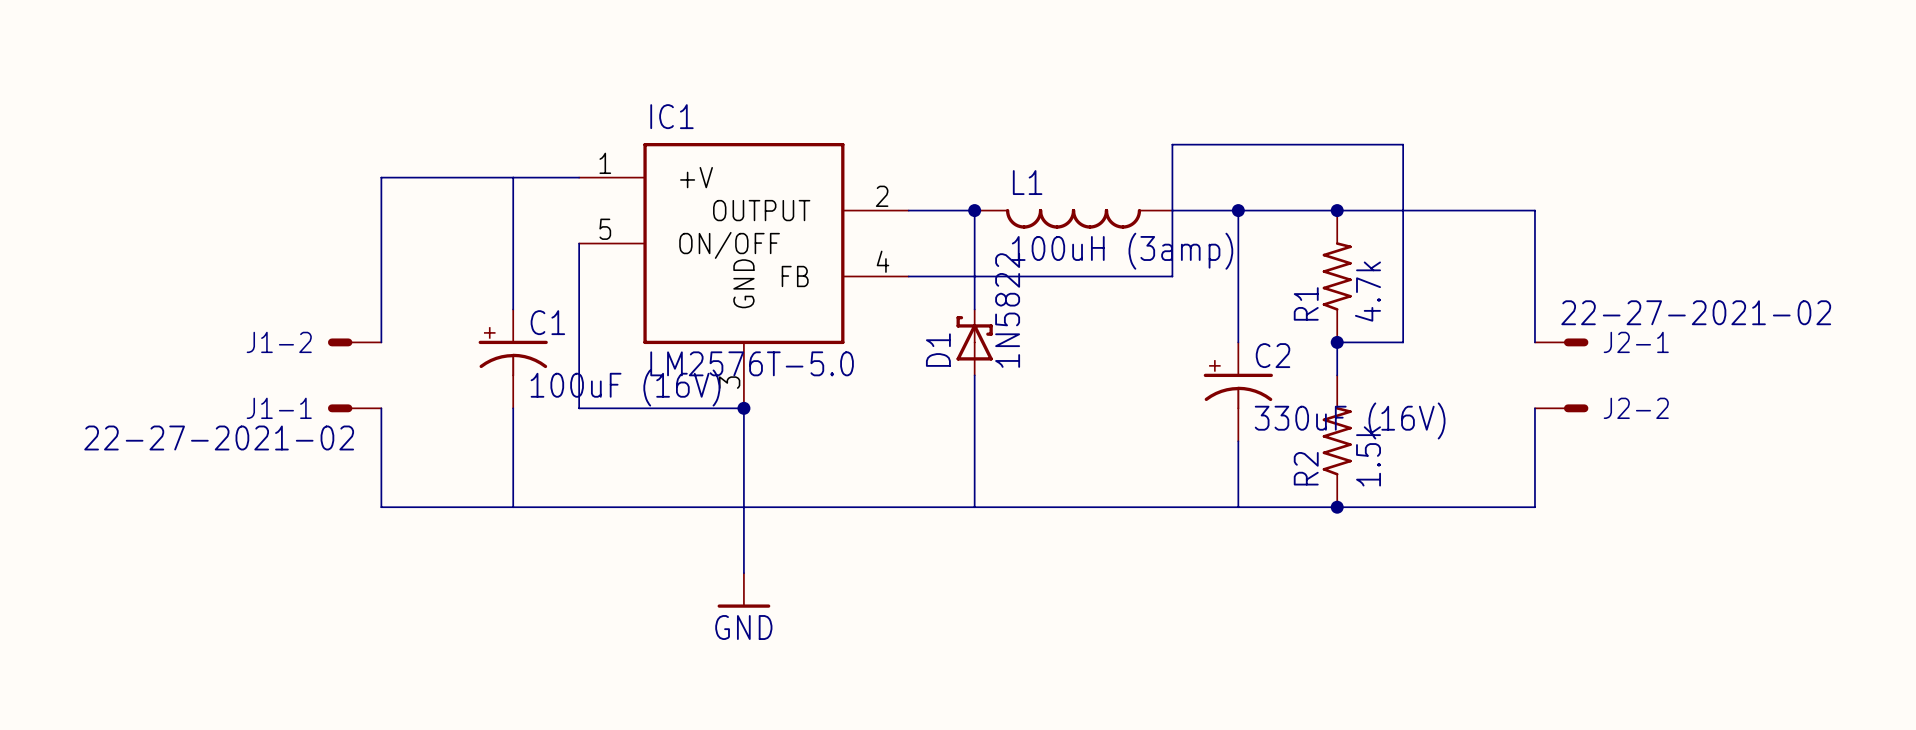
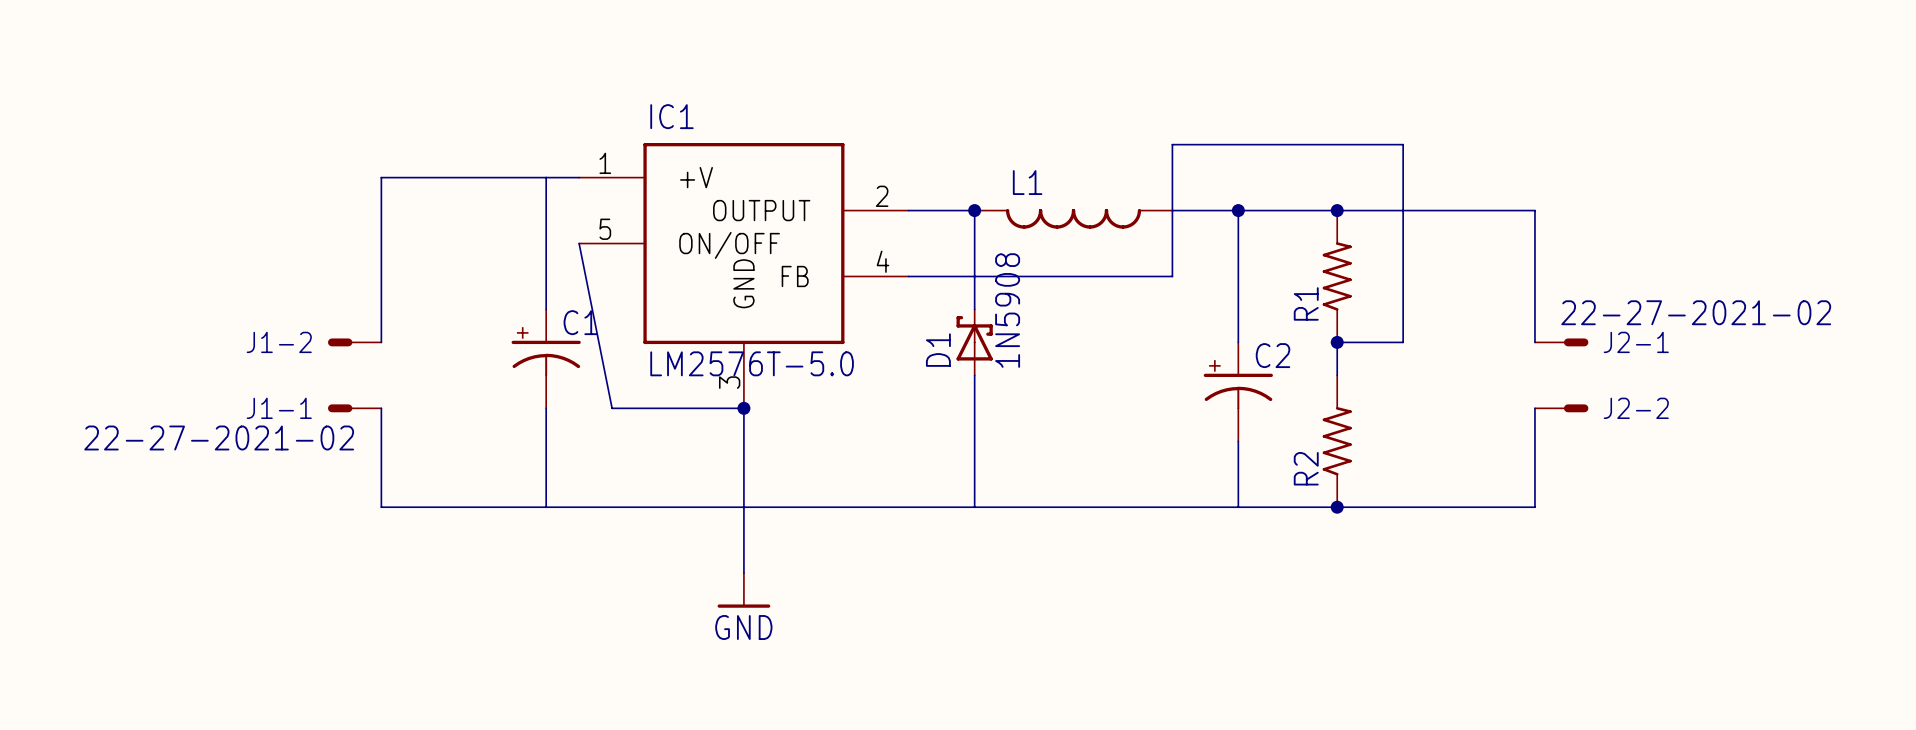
wire: (513, 177) (513, 309) -> (546, 177) (546, 309)
wire: (579, 243) (579, 408) (612, 408) -> (579, 243) (612, 408)
L1 value: 100uH (3amp) (1122, 251) -> none
R1 value: 4.7k (1367, 291) -> none
D1 value: 1N5822 (1007, 310) -> 1N5908 (1007, 310)
C1 position: (513, 358) -> (546, 358)
C1 value: 100uF (16V) (625, 388) -> none
wire: (513, 408) (513, 507) -> (546, 408) (546, 507)
C2 value: 330uF (16V) (1350, 420) -> none
R2 value: 1.5k (1368, 456) -> none

